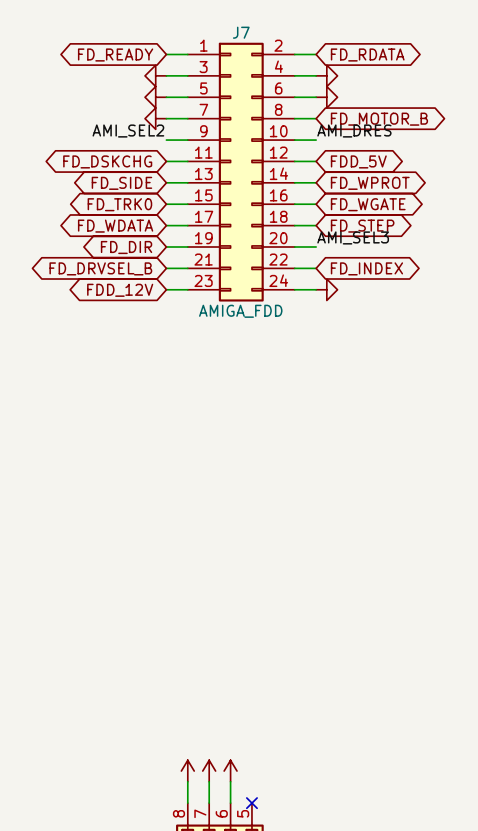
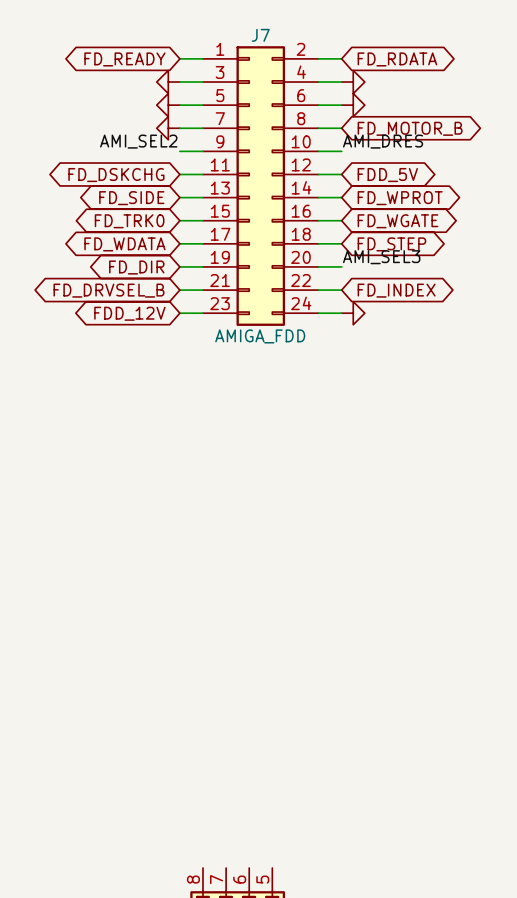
power symbol: (187, 771) -> none
power symbol: (209, 771) -> none
power symbol: (230, 771) -> none
wire: (187, 781) (187, 803) -> none
wire: (209, 781) (209, 803) -> none
wire: (230, 781) (230, 803) -> none
no-connect mark: (251, 803) -> none

